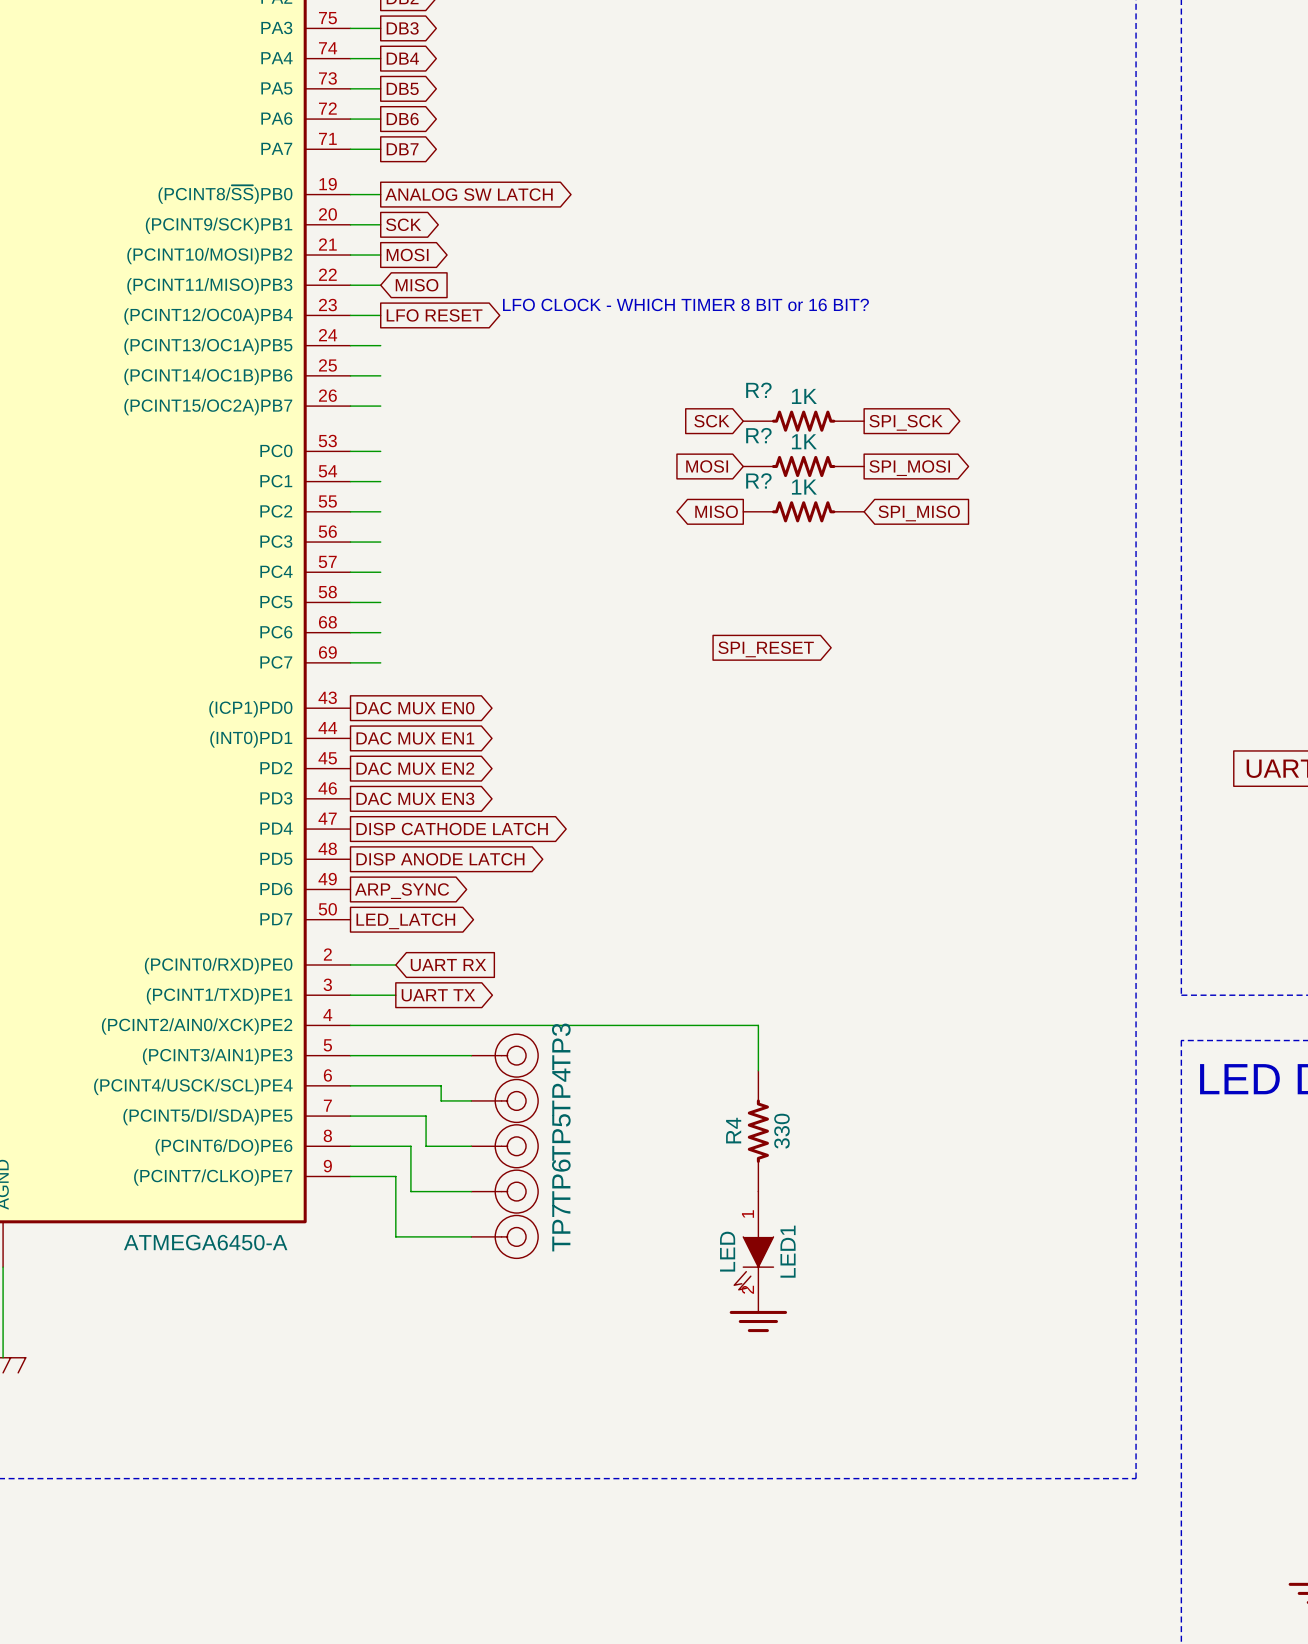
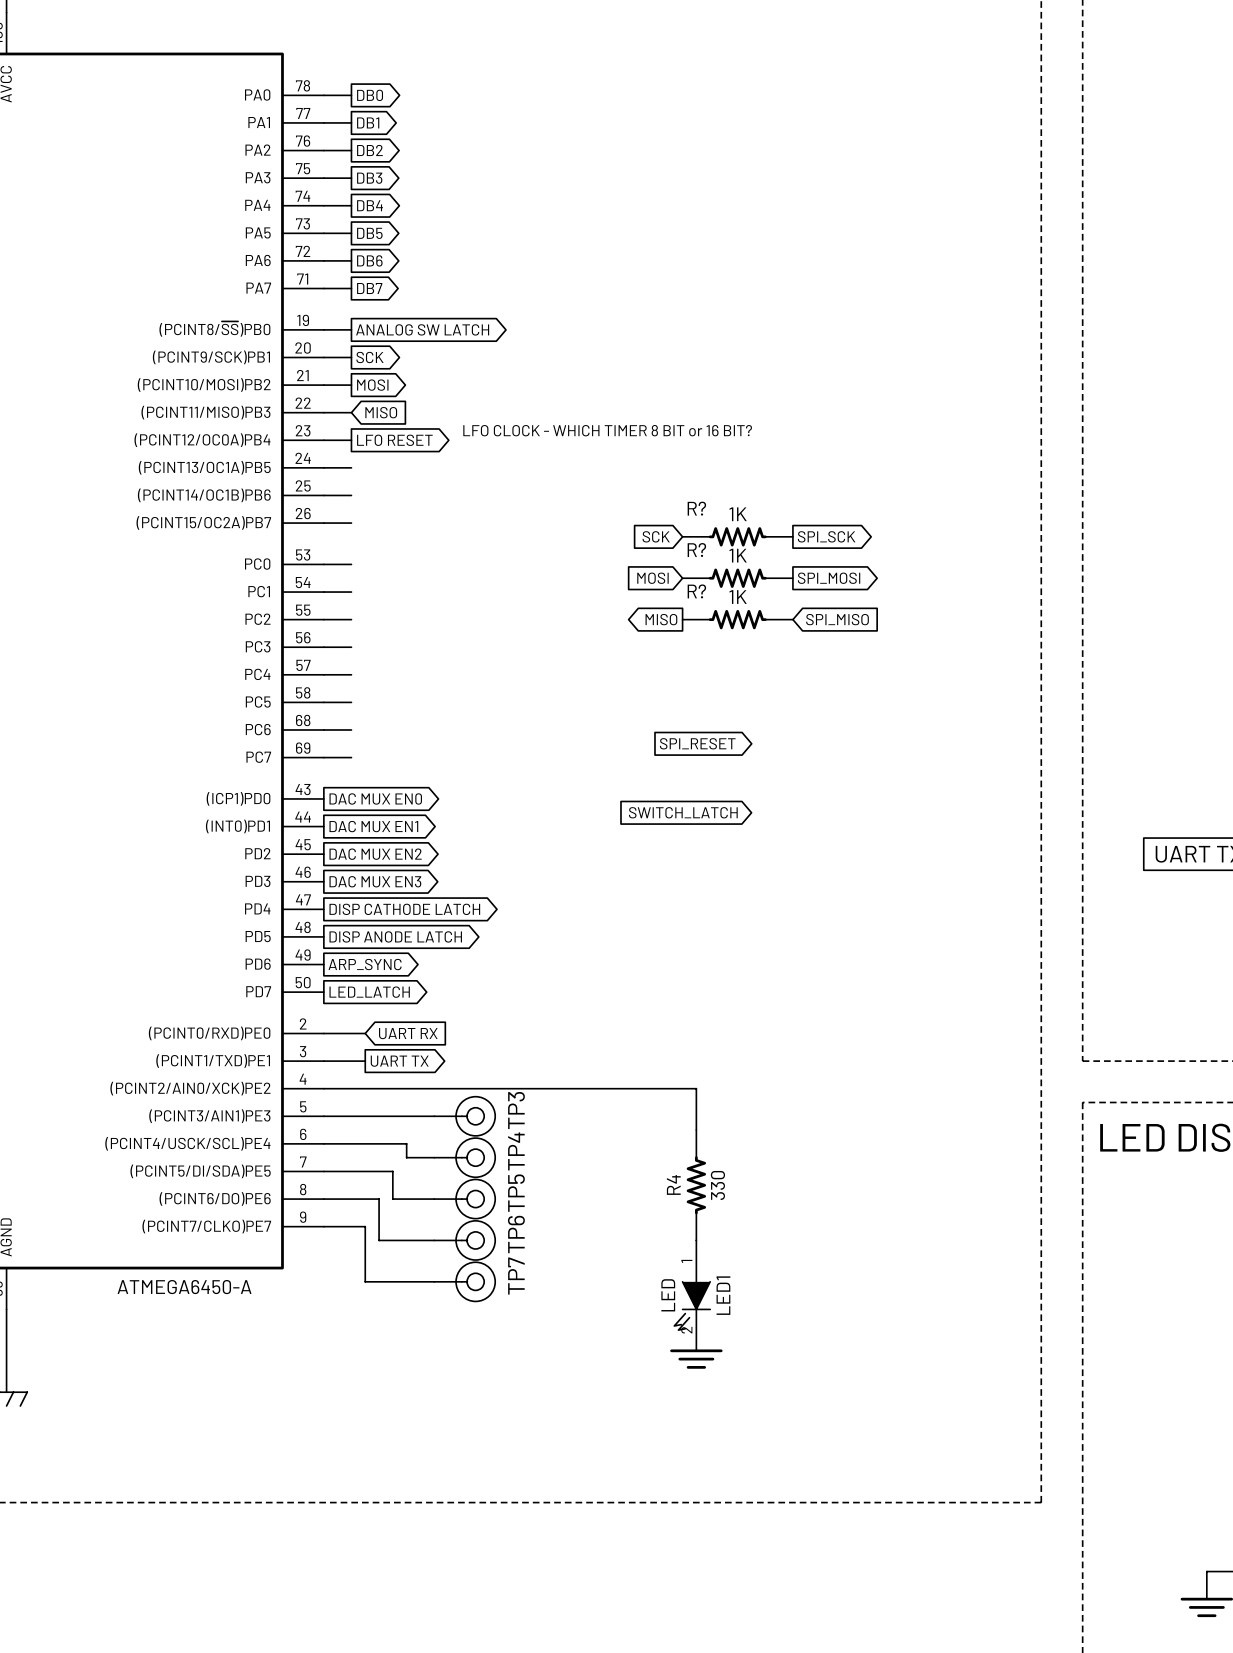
global label: none -> SWITCH_LATCH (683, 812)

